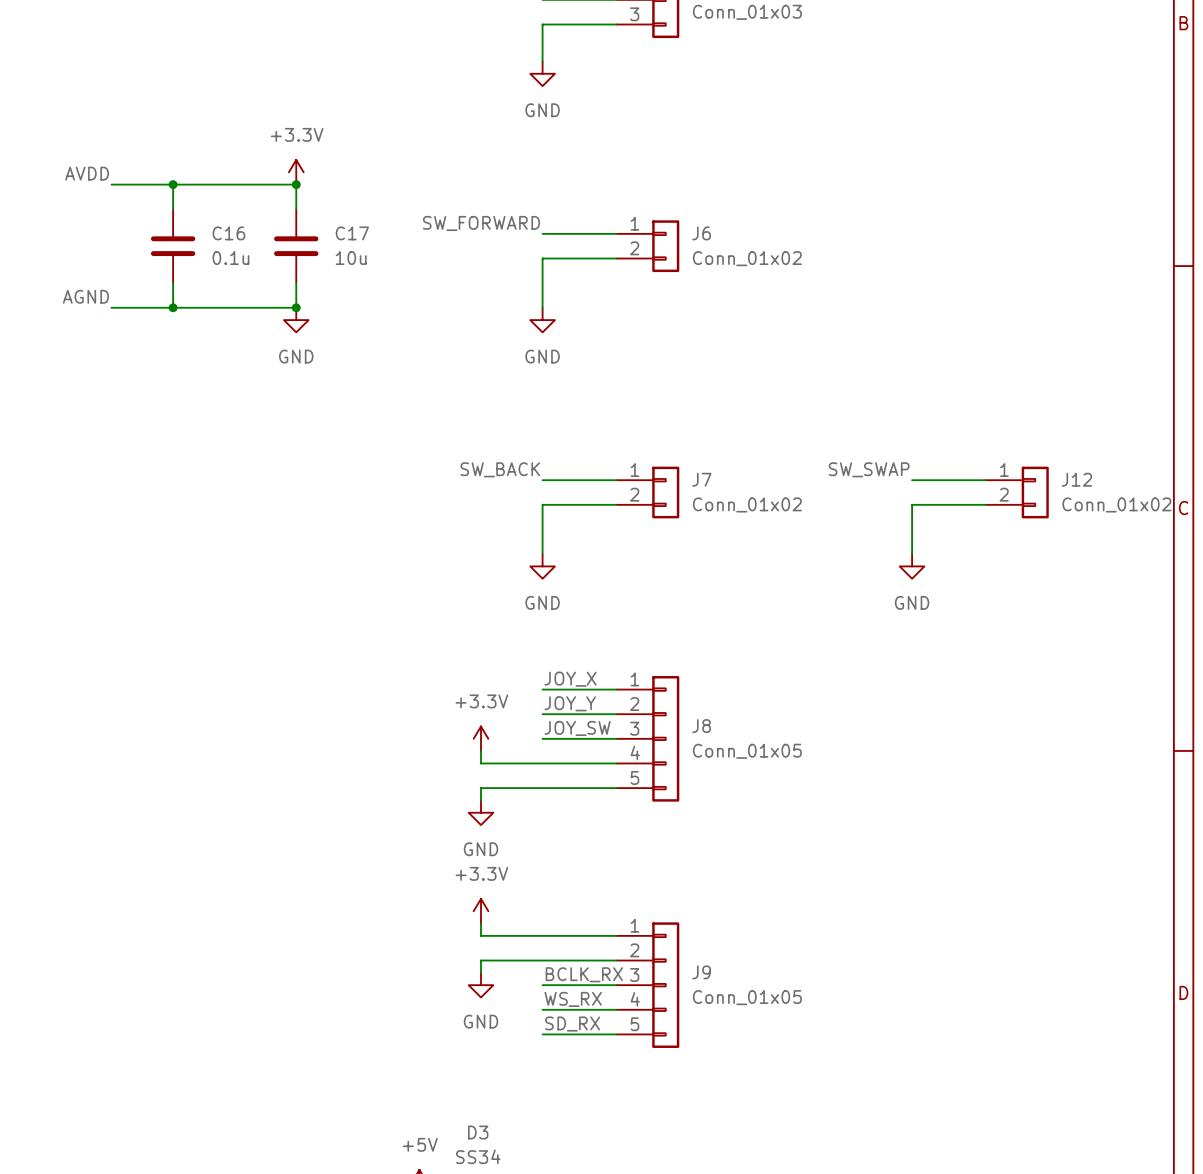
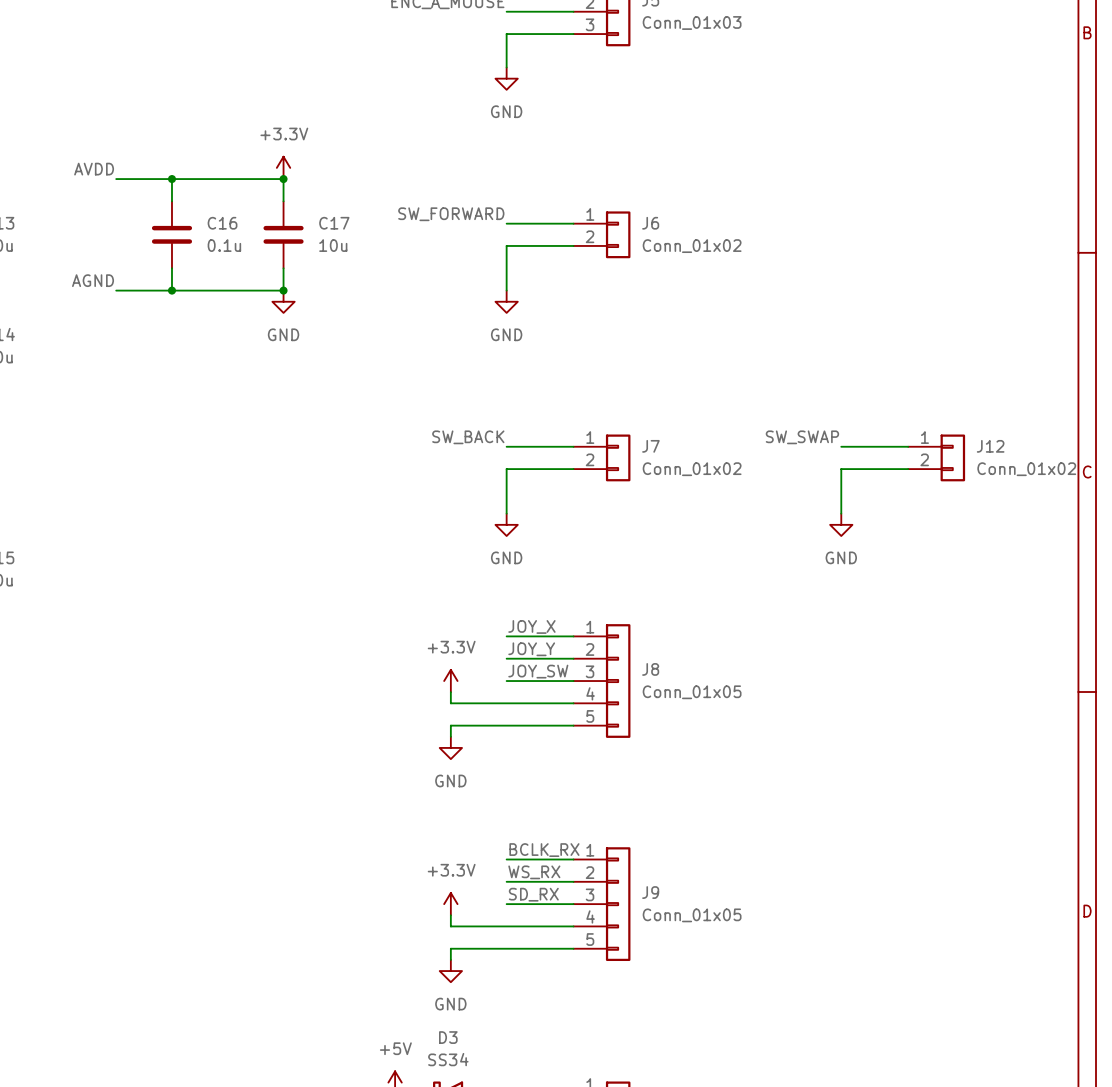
power symbol: +3.3V (481, 911) -> none
wire: (481, 923) (481, 935) (542, 935) -> (450, 915) (450, 926) (506, 926)
label: none -> BCLK_RX (544, 850)
wire: (542, 960) (481, 960) (481, 972) -> (506, 948) (450, 948) (450, 959)
label: BCLK_RX (584, 974) -> SD_RX (533, 894)
power symbol: GND (481, 985) -> +3.3V (450, 904)
label position: WS_RX (573, 999) -> WS_RX (534, 872)
label: SD_RX (572, 1024) -> none
power symbol: none -> GND (450, 971)

